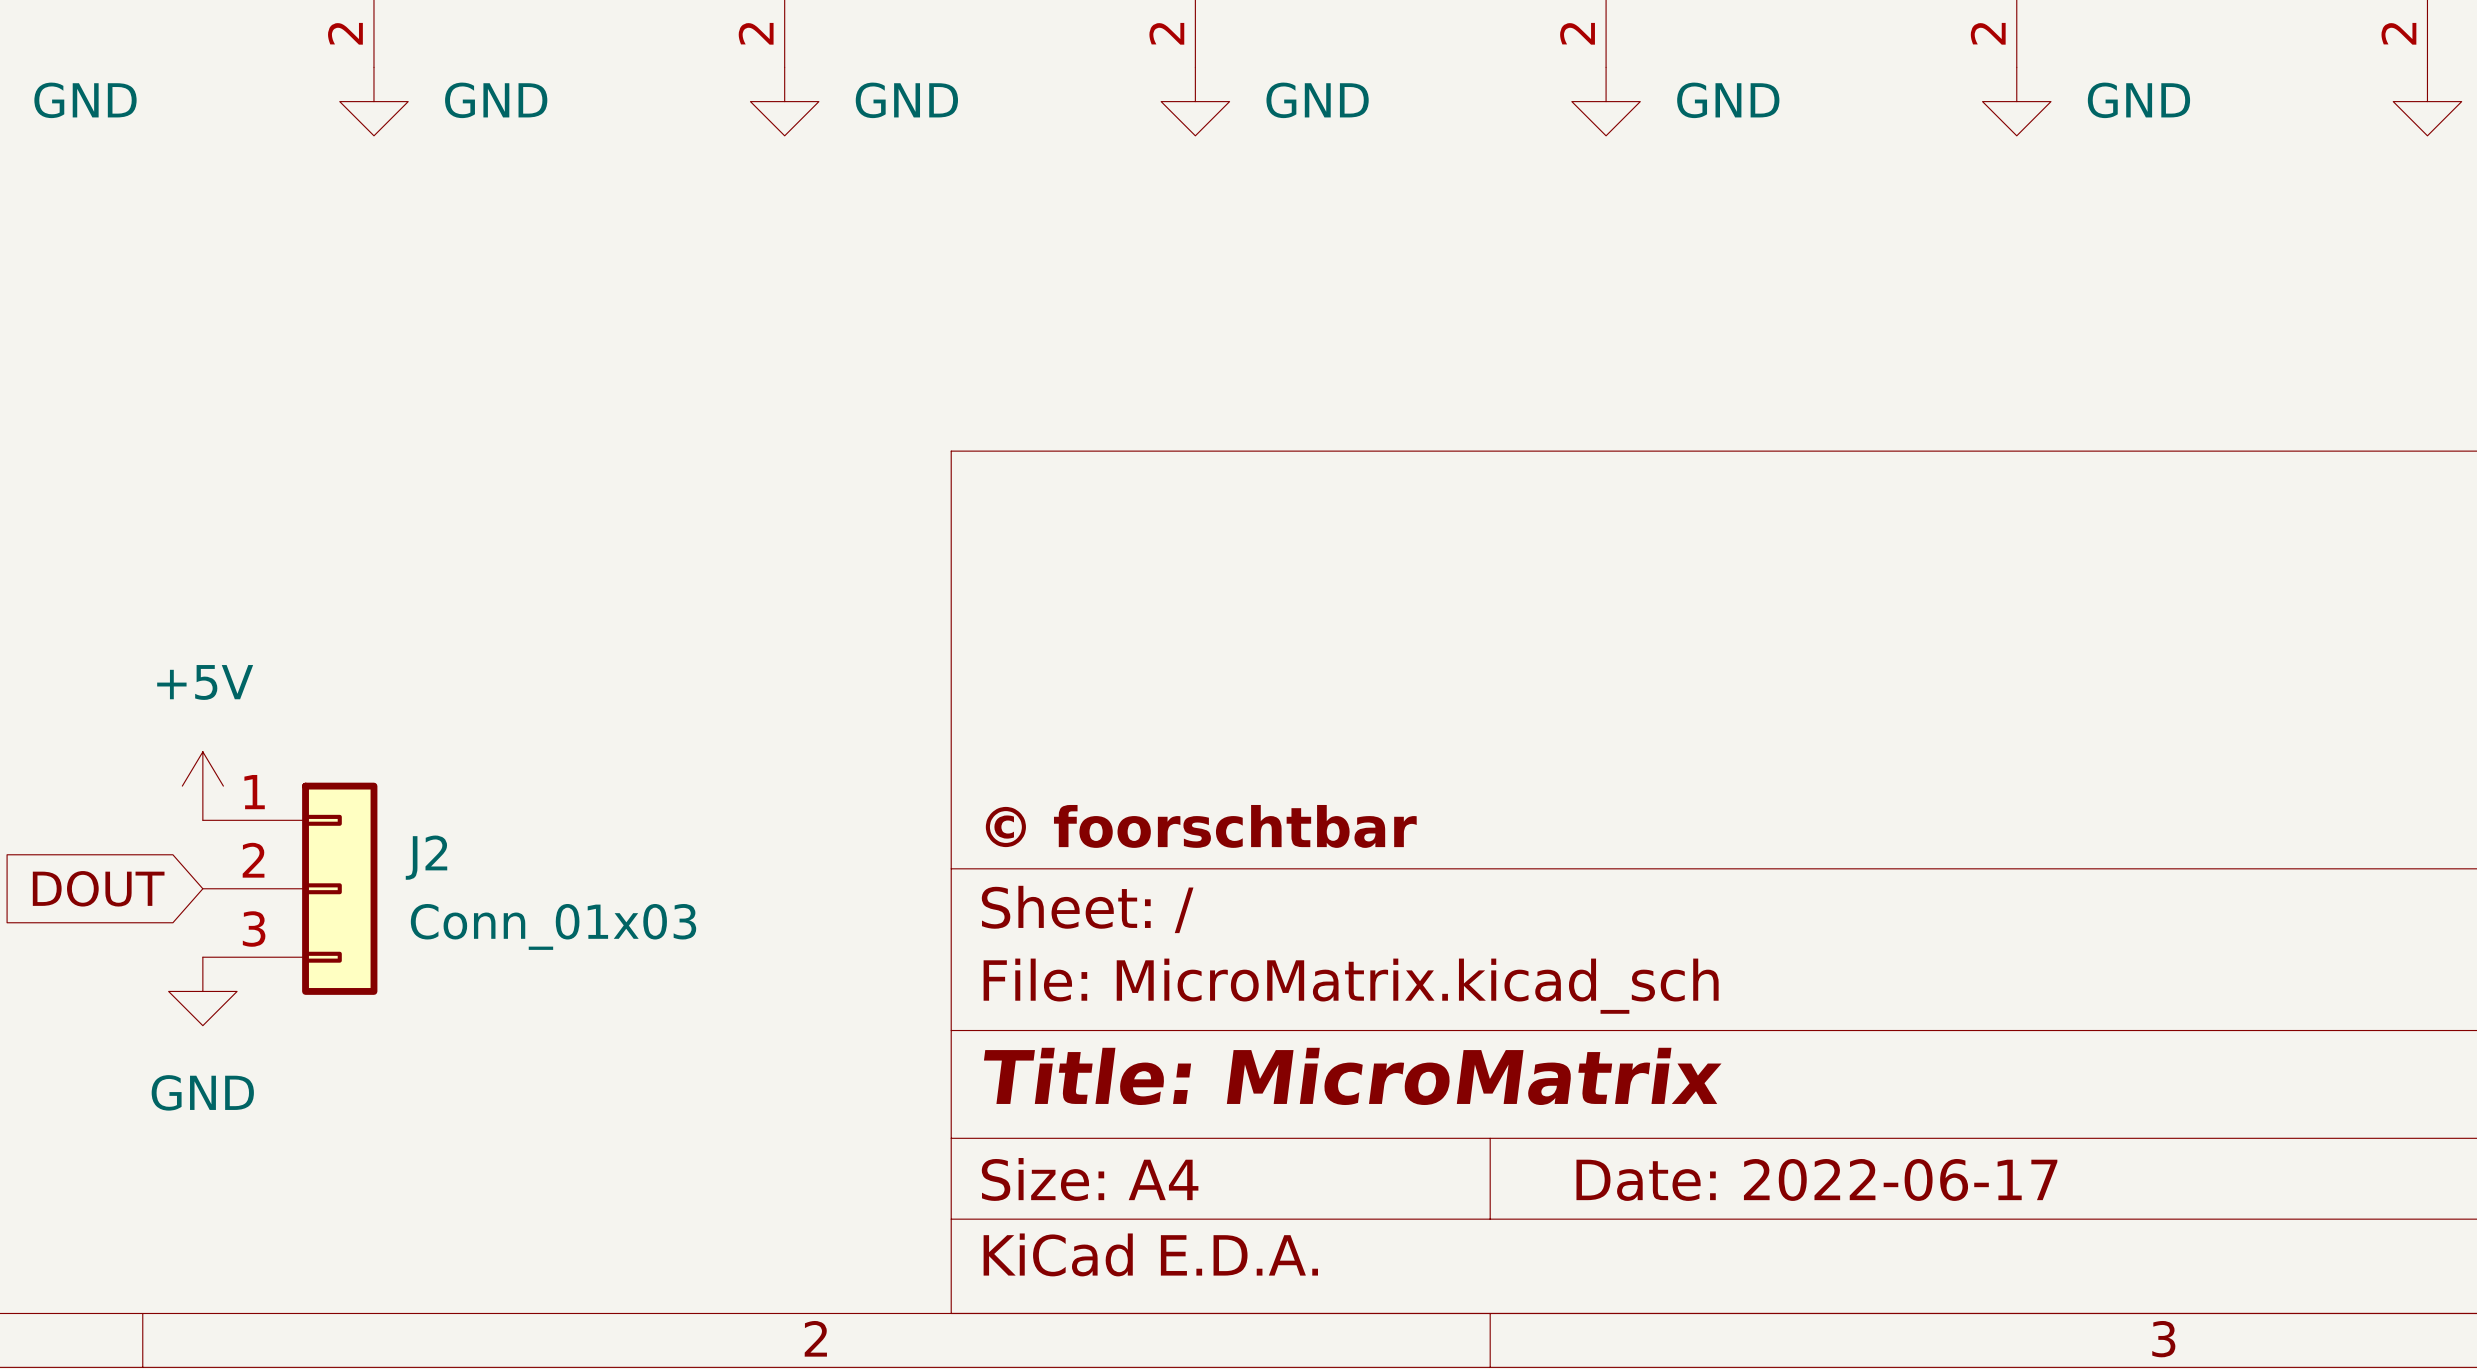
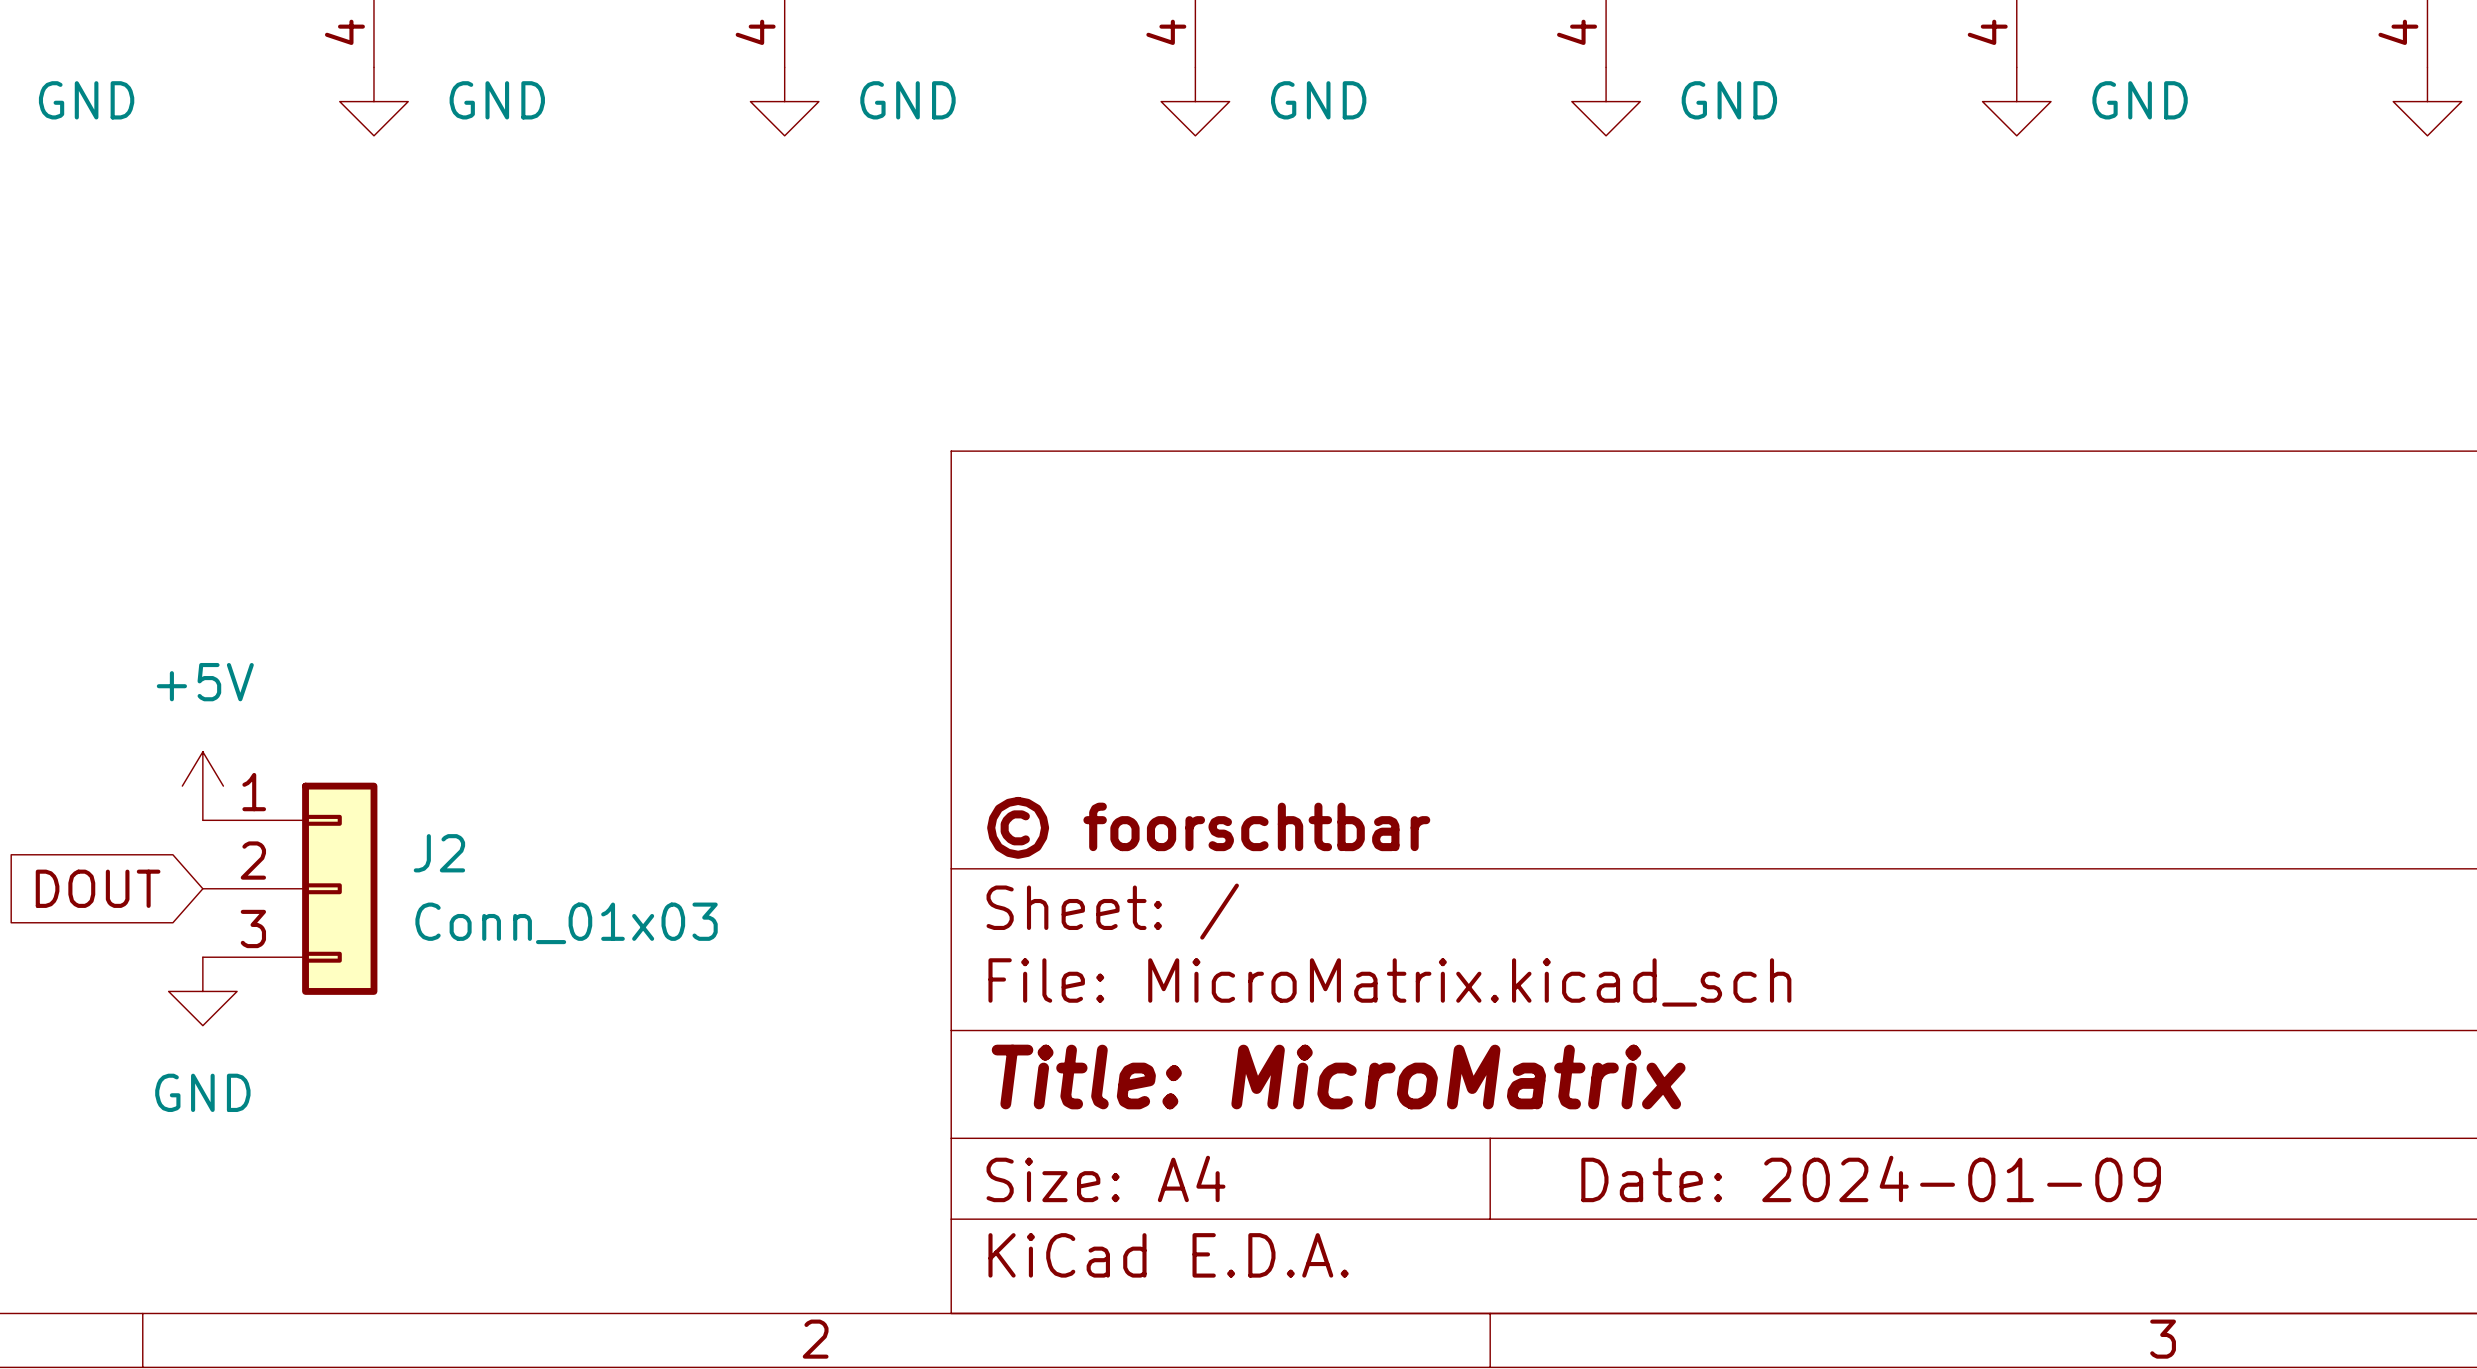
part pin number: 2 (345, 33) -> 4 (344, 32)
part pin number: 2 (756, 33) -> 4 (755, 32)
part pin number: 2 (1166, 33) -> 4 (1166, 32)
part pin number: 2 (1577, 33) -> 4 (1577, 32)
part pin number: 2 (1988, 33) -> 4 (1987, 32)
part pin number: 2 (2398, 33) -> 4 (2398, 32)
title block: Date: 2022-06-17 (1816, 1179) -> Date: 2024-01-09 (1871, 1178)

